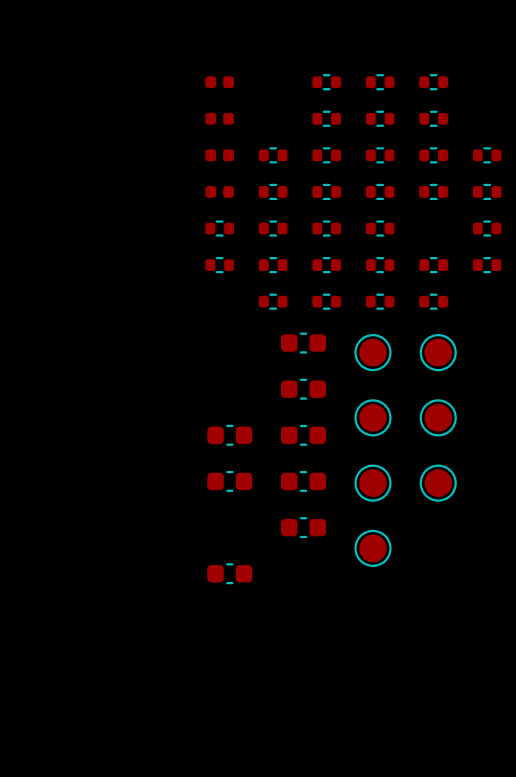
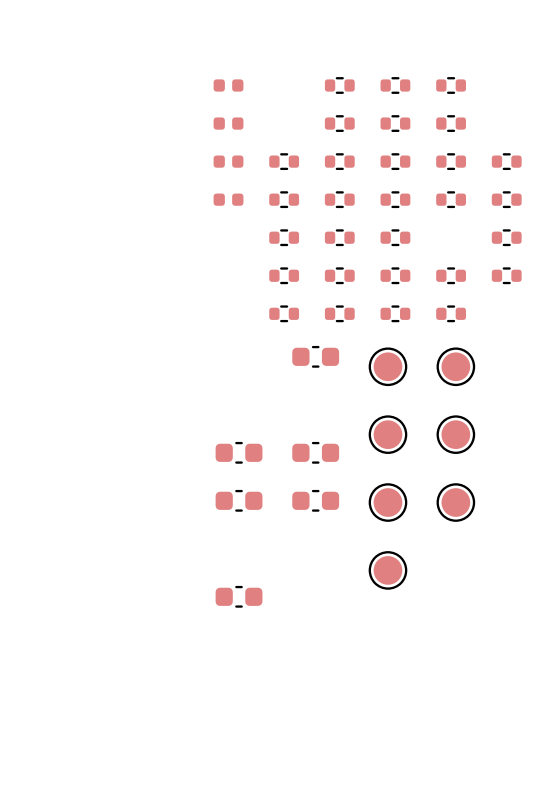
part: (219, 228) -> none
part: (219, 265) -> none
part: (303, 389) -> none
part: (303, 527) -> none

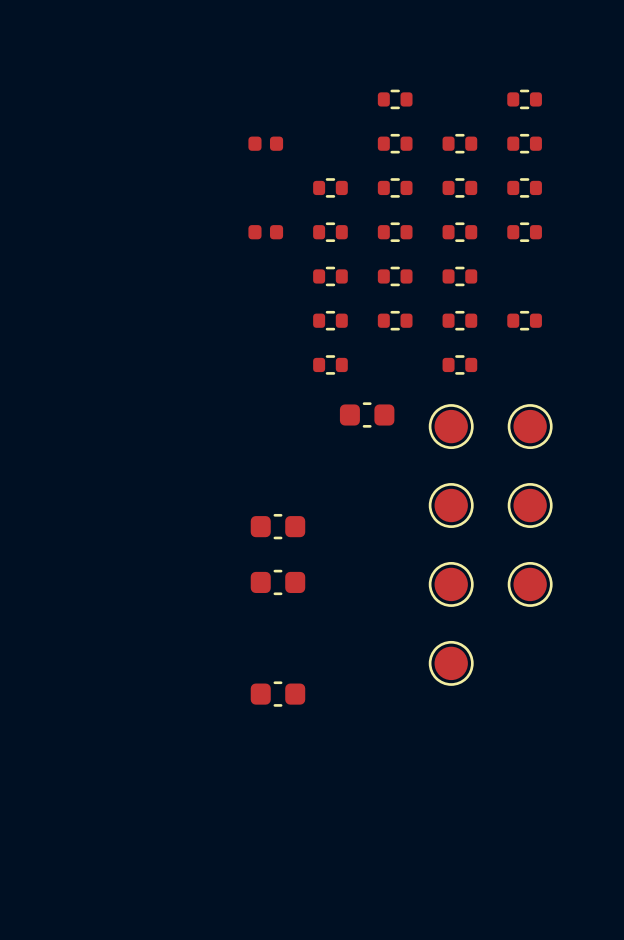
part: (228, 85) -> none
part: (395, 85) -> none
part: (228, 161) -> none
part: (506, 161) -> none
part: (506, 199) -> none
part: (506, 237) -> none
part: (506, 275) -> none
part: (339, 313) -> none
part: (451, 313) -> none
part: (315, 452) -> none
part: (315, 500) -> none

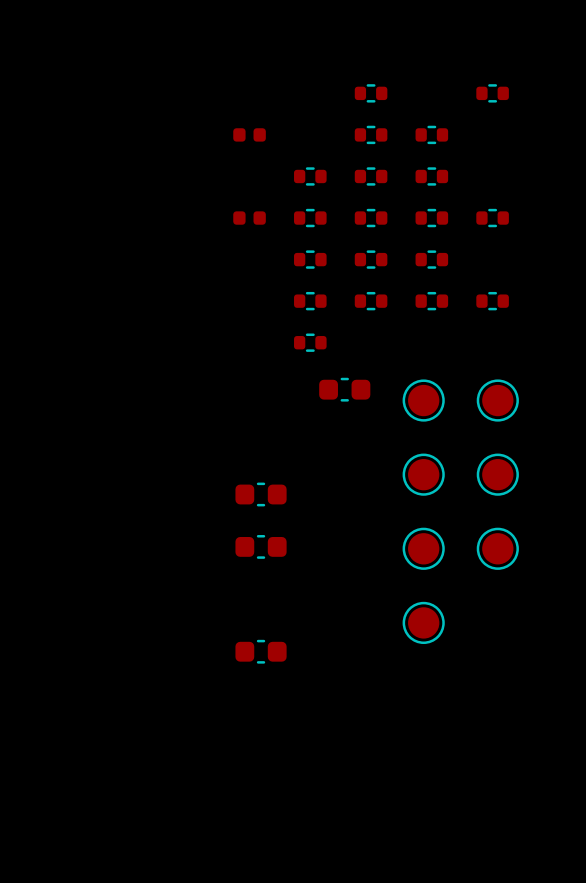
part: (524, 143) -> none
part: (524, 187) -> none
part: (459, 364) -> none

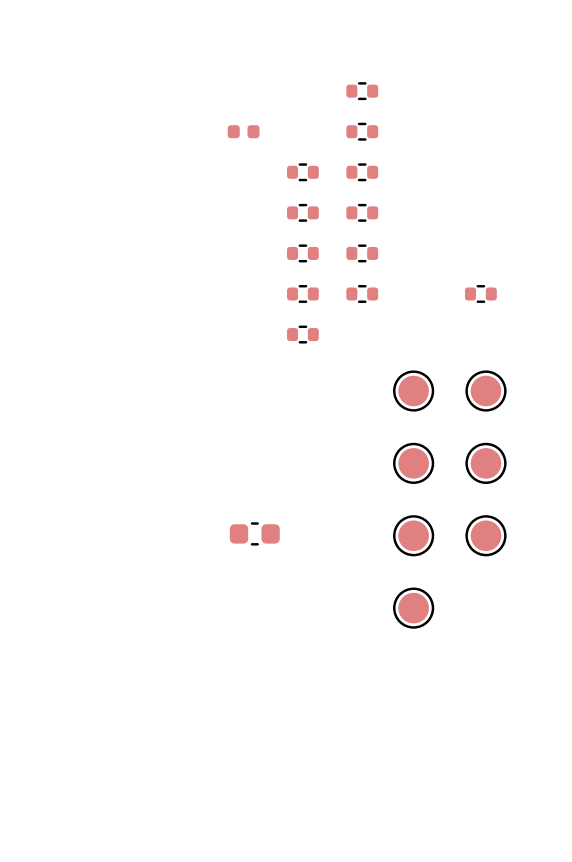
part: (492, 93) -> none
part: (431, 134) -> none
part: (431, 176) -> none
part: (249, 218) -> none
part: (431, 218) -> none
part: (492, 218) -> none
part: (431, 259) -> none
part: (431, 301) -> none
part: (344, 389) -> none
part: (261, 494) -> none
part: (261, 651) -> none

